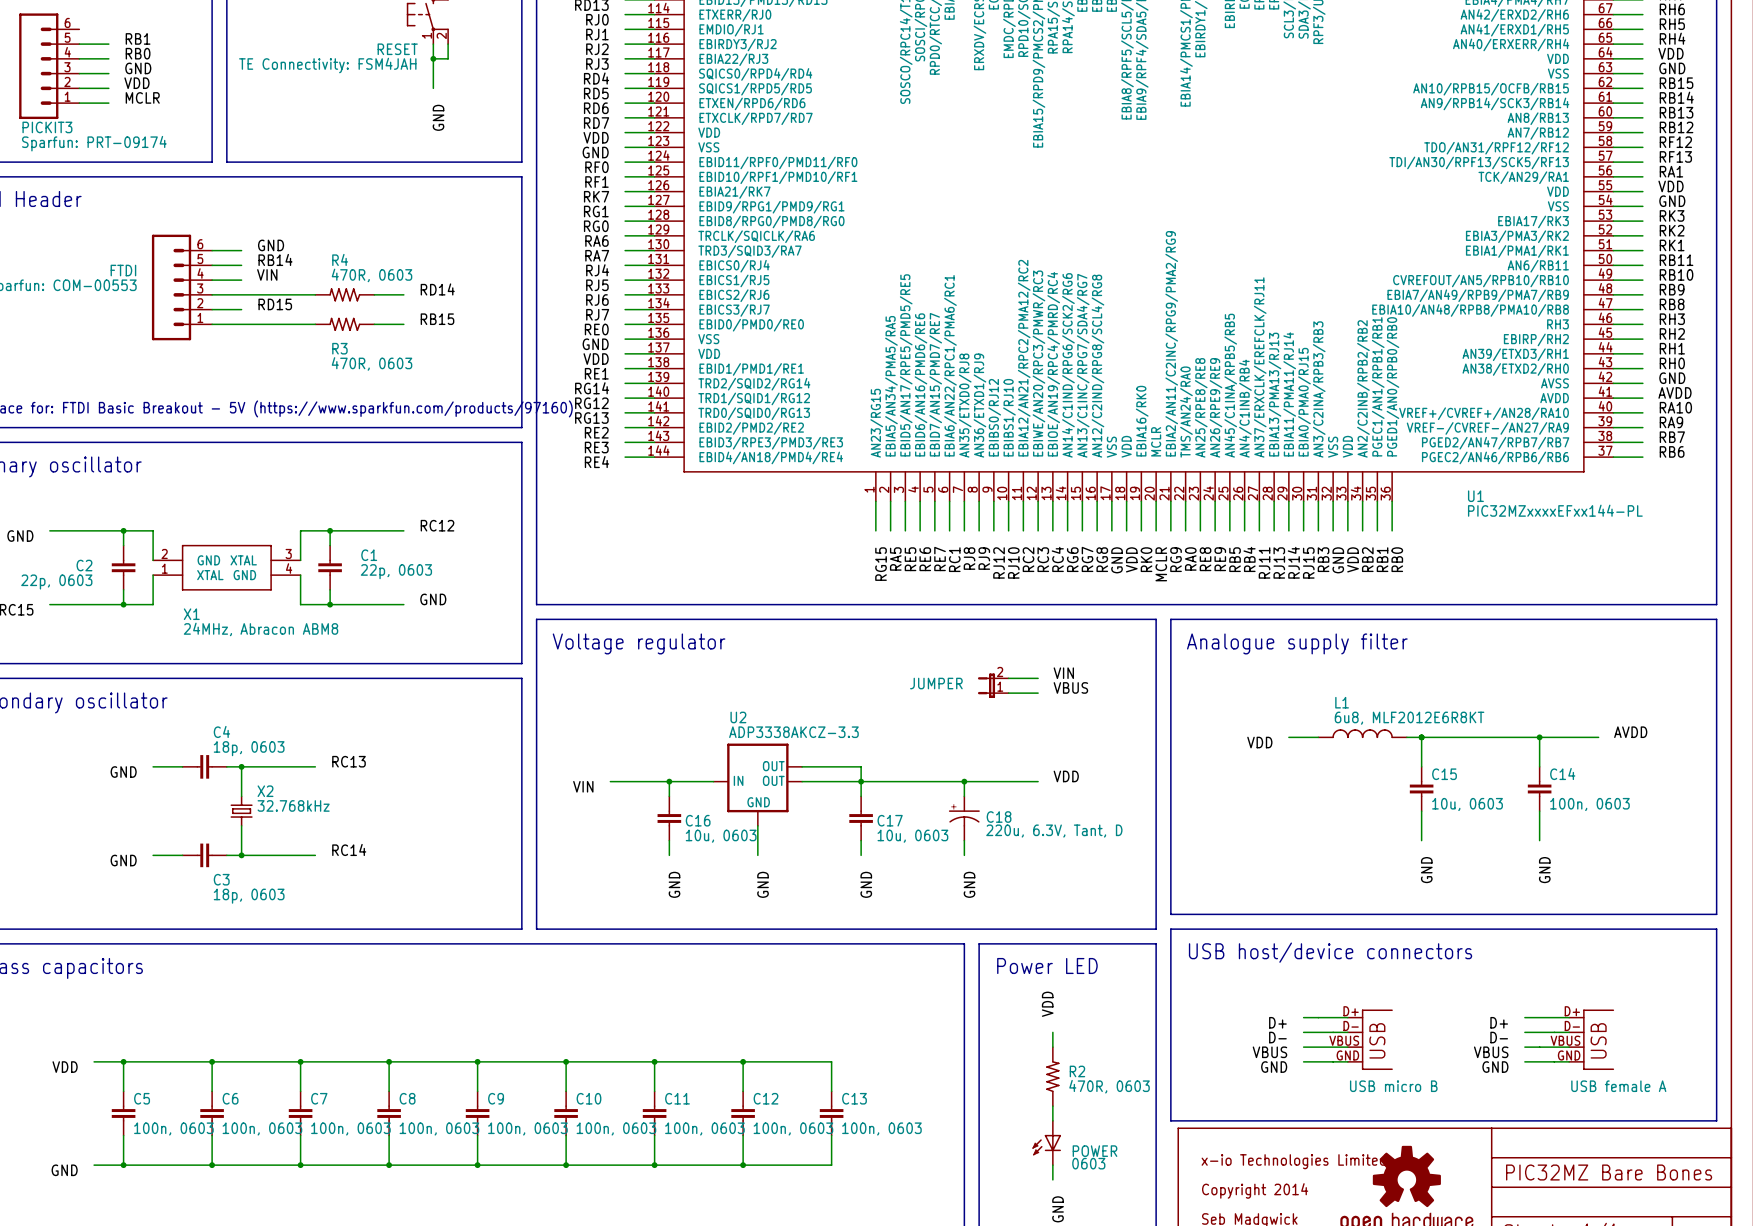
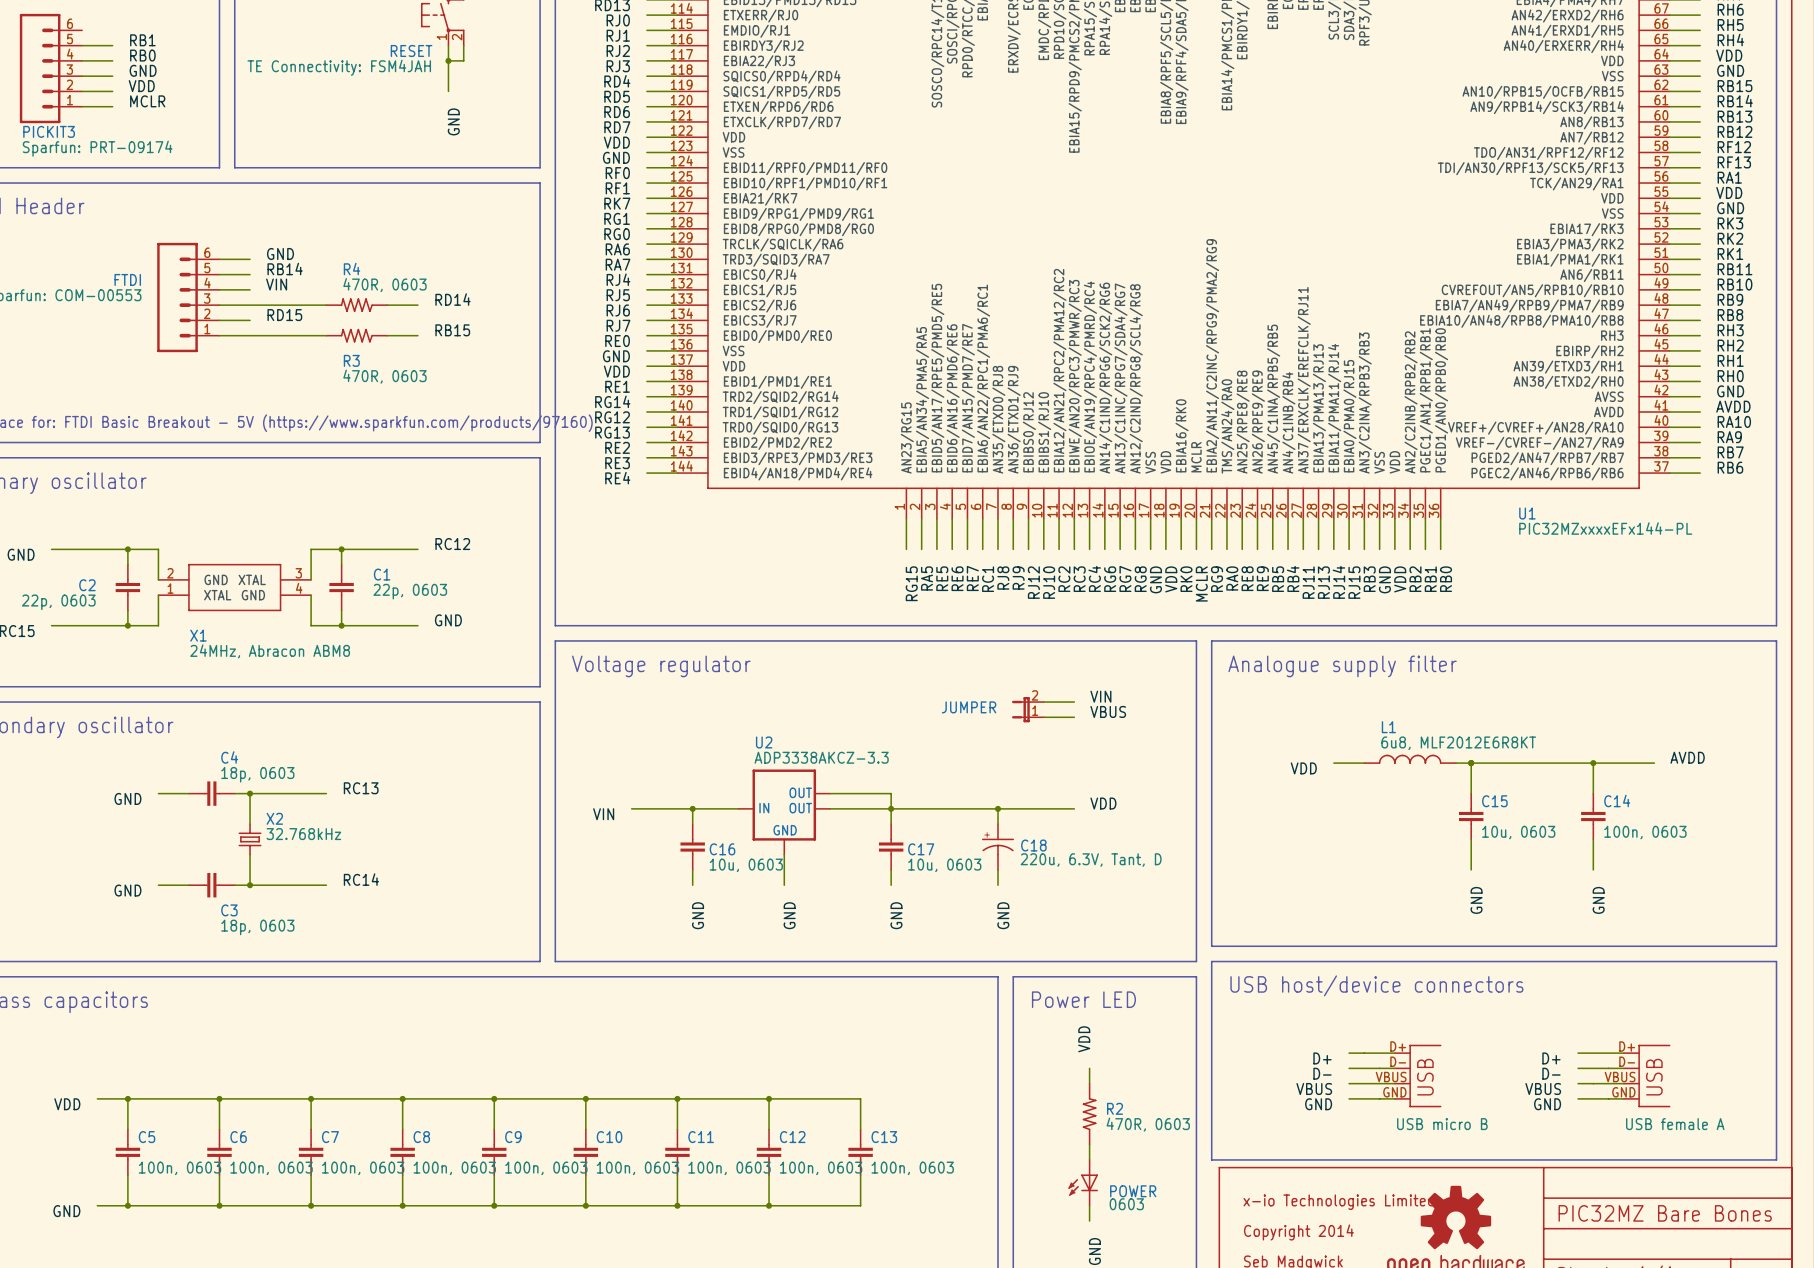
U1 value: PIC32MZxxxxEFxx144-PL (1555, 510) -> PIC32MZxxxxEFx144-PL (1605, 528)

